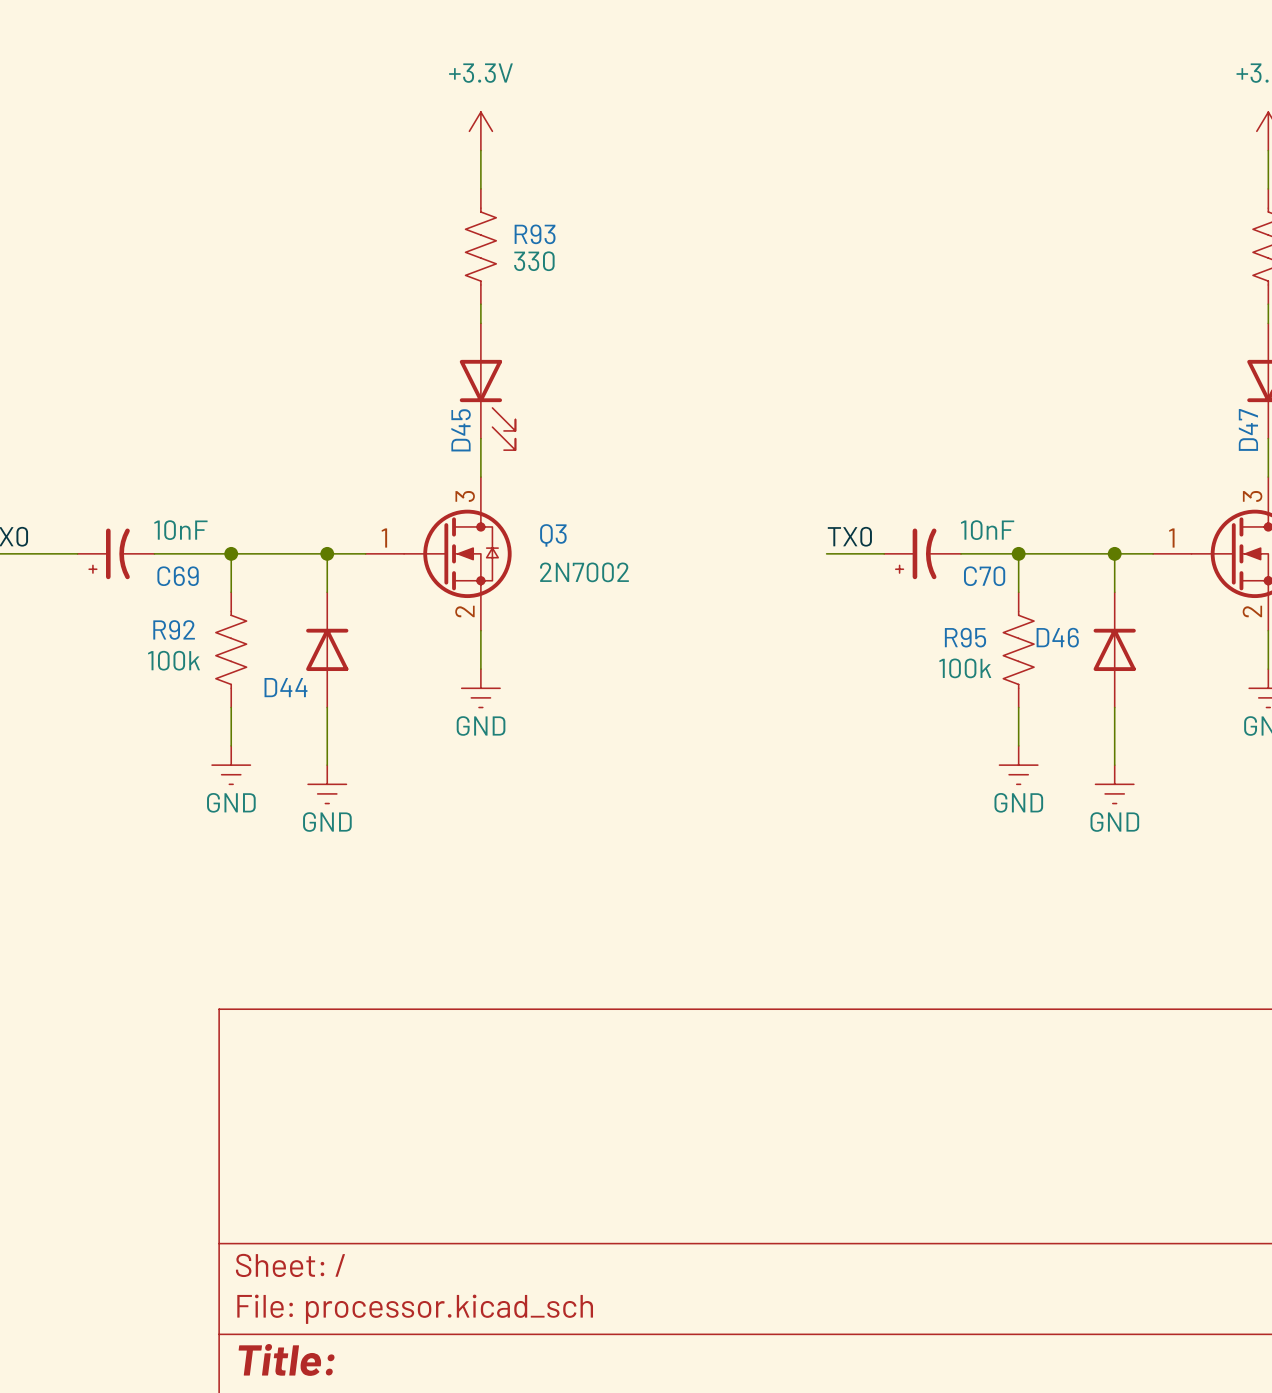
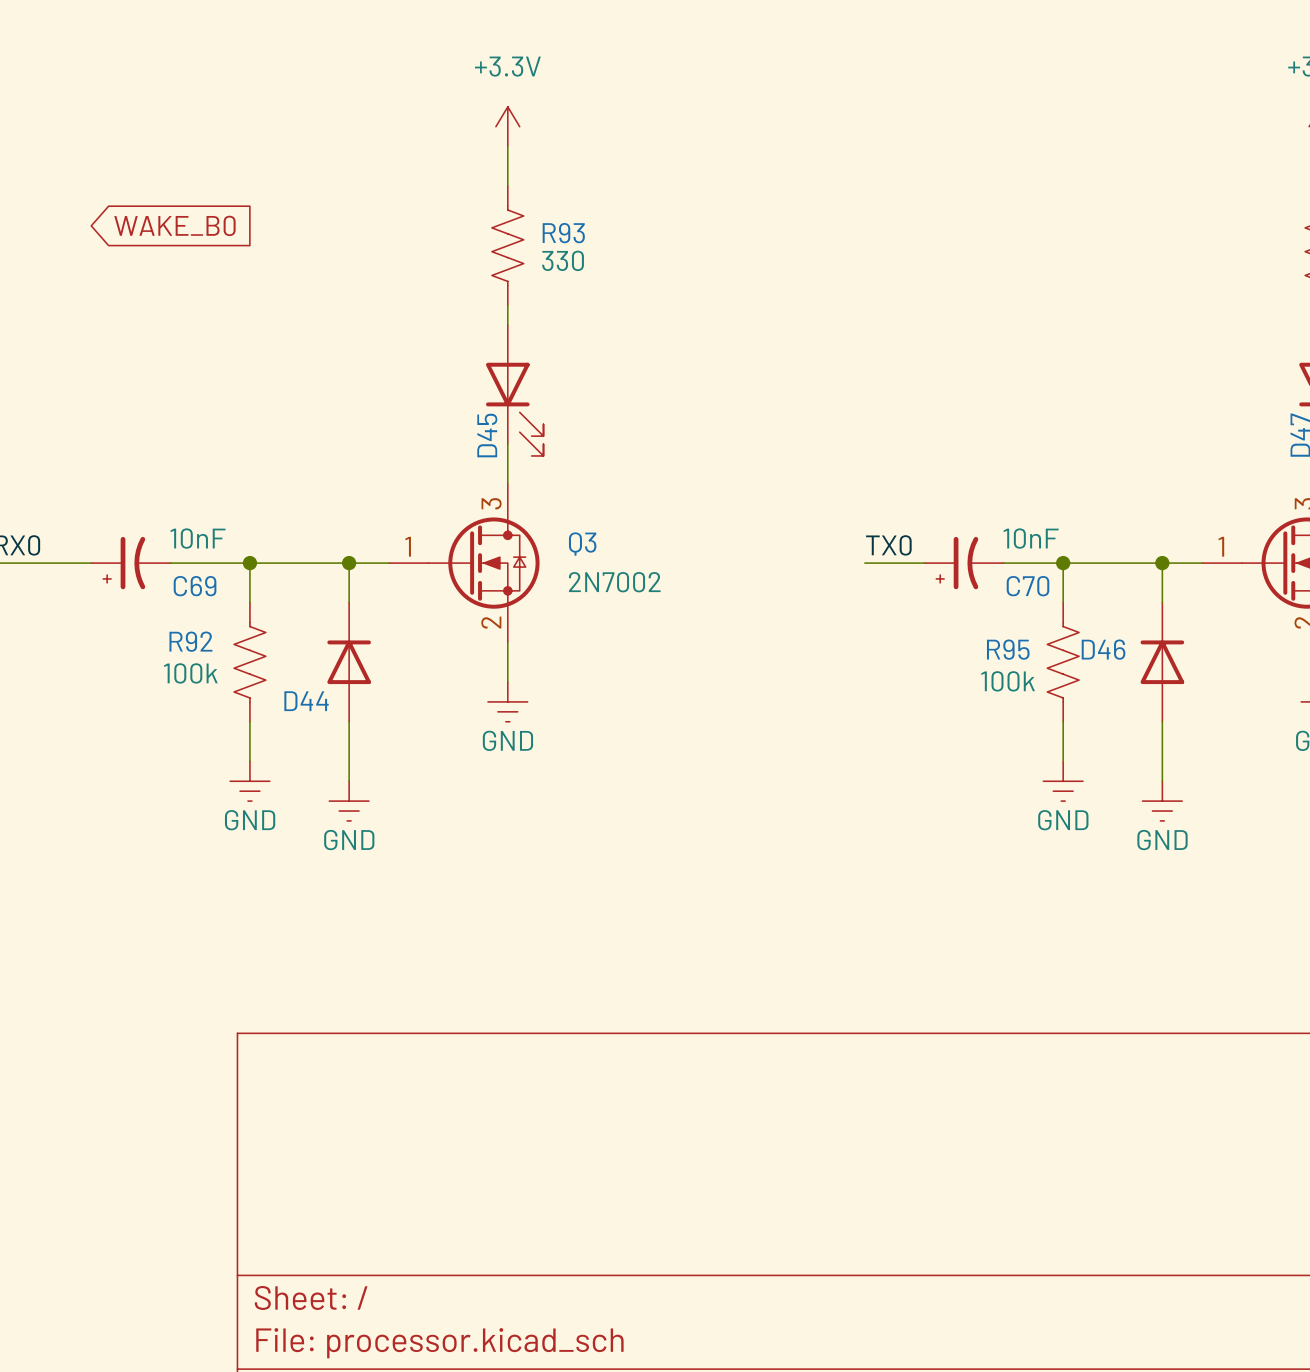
global label: none -> WAKE_B0 (174, 225)

